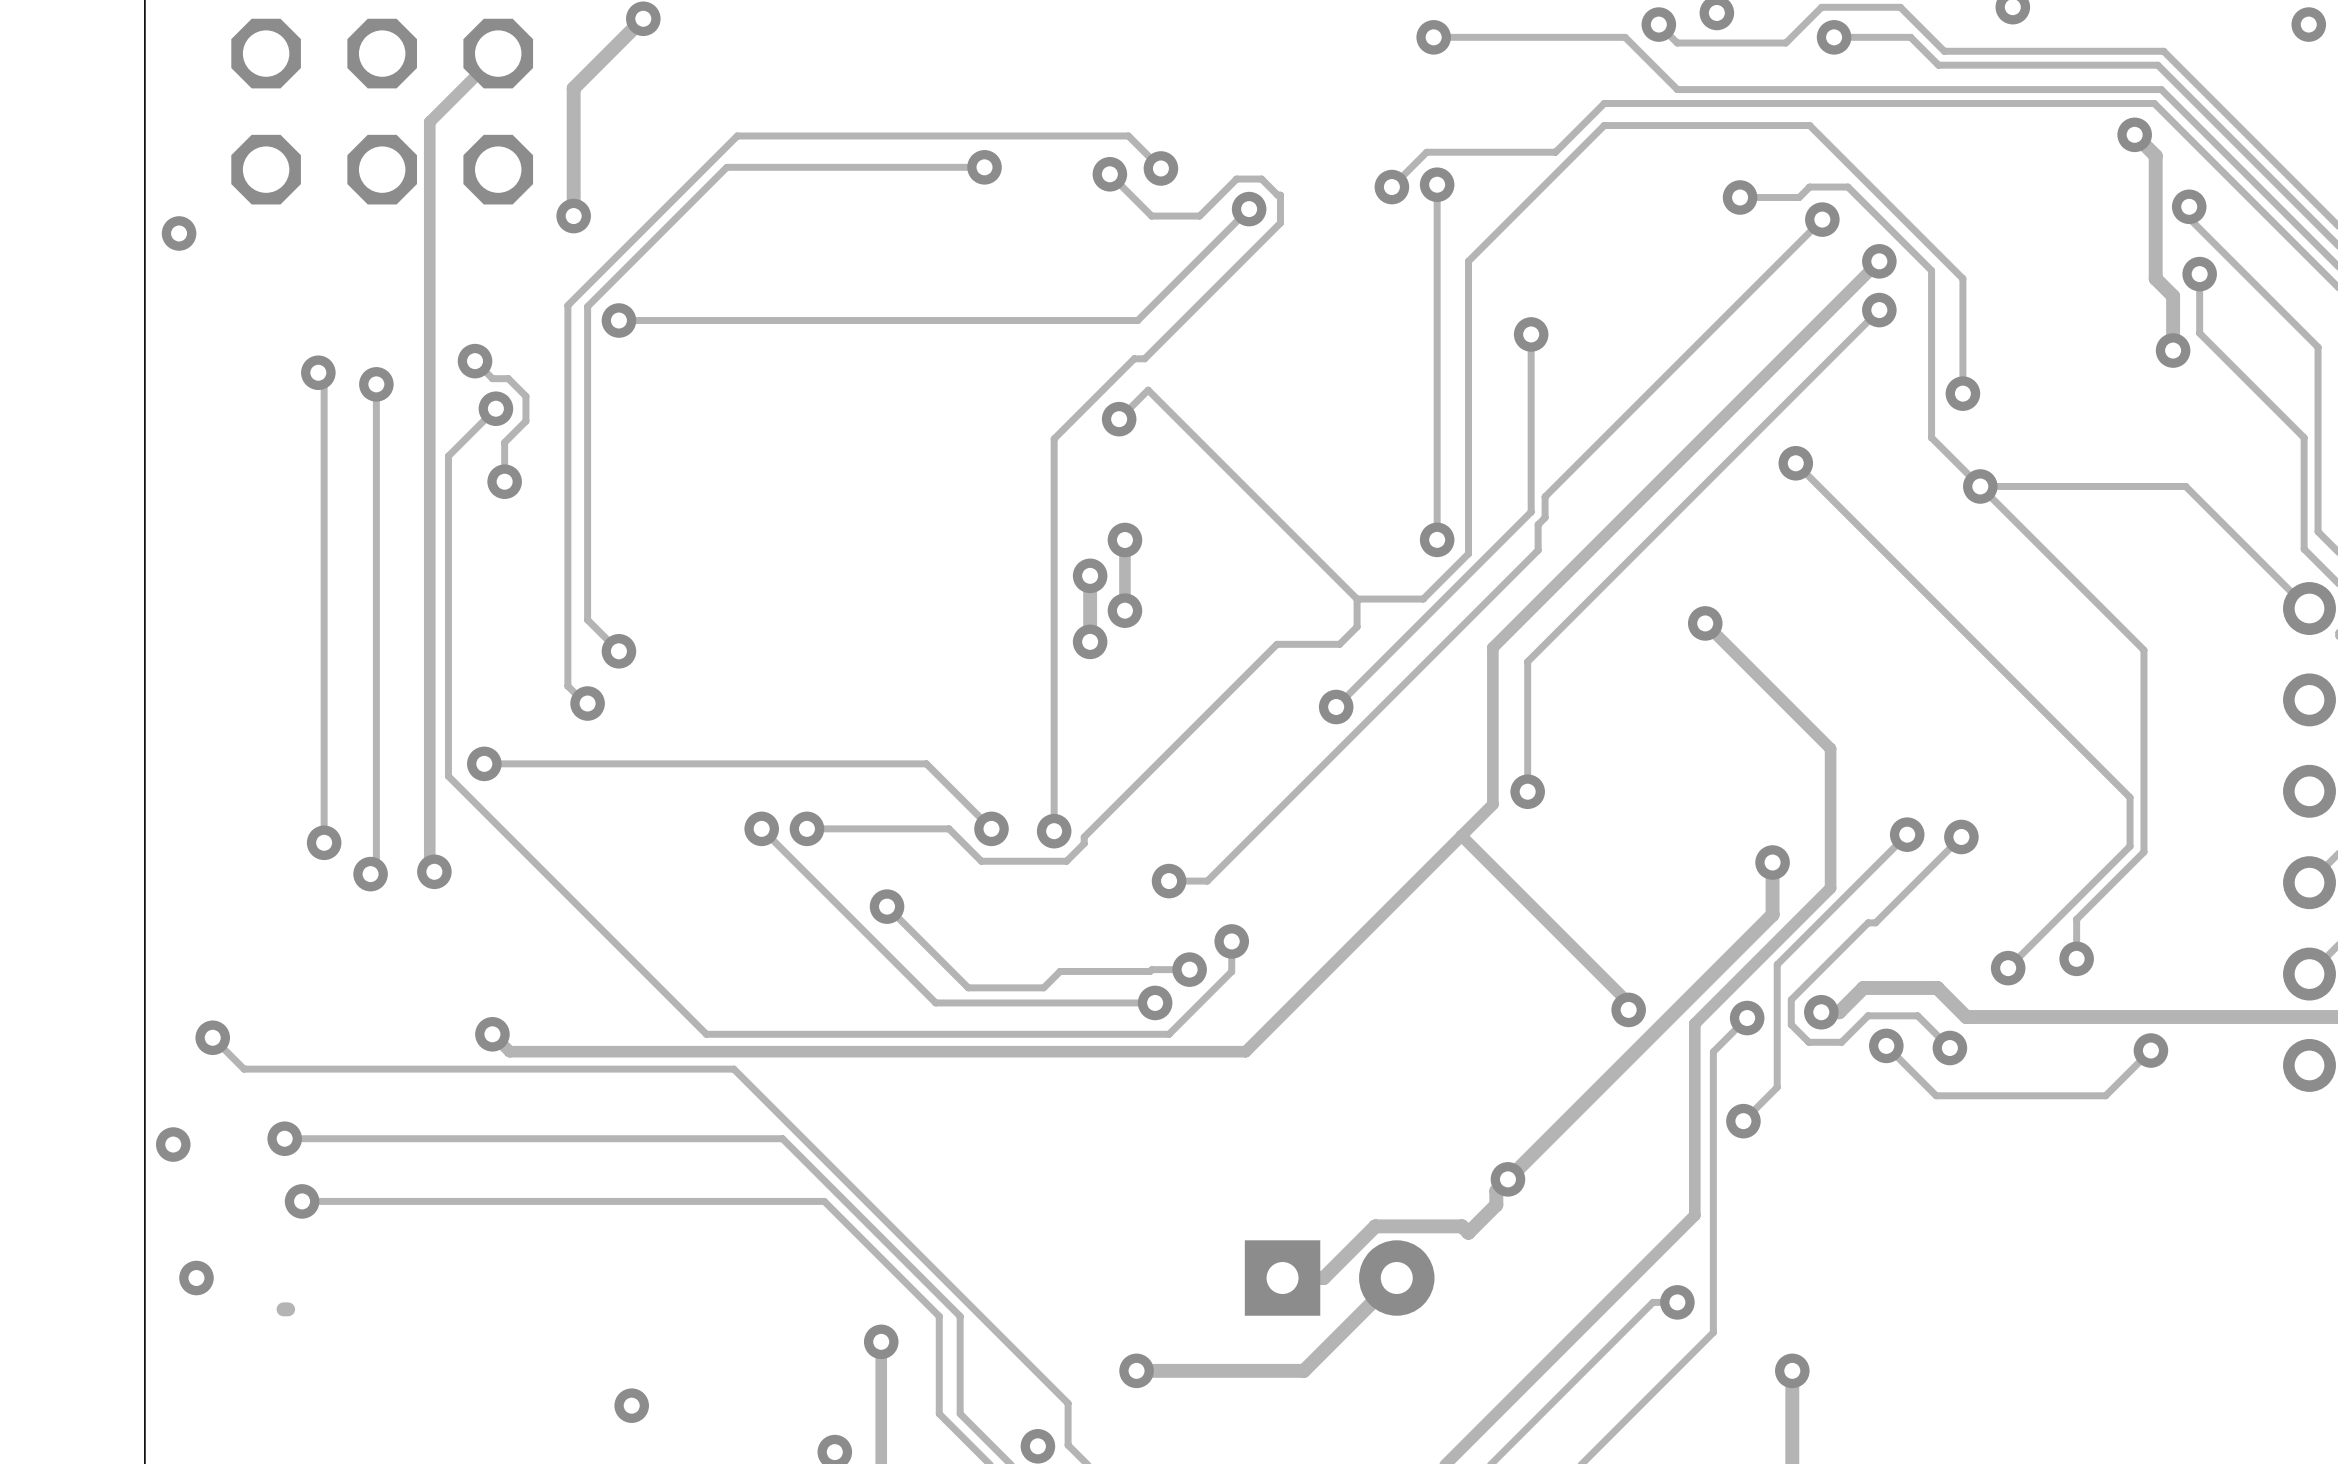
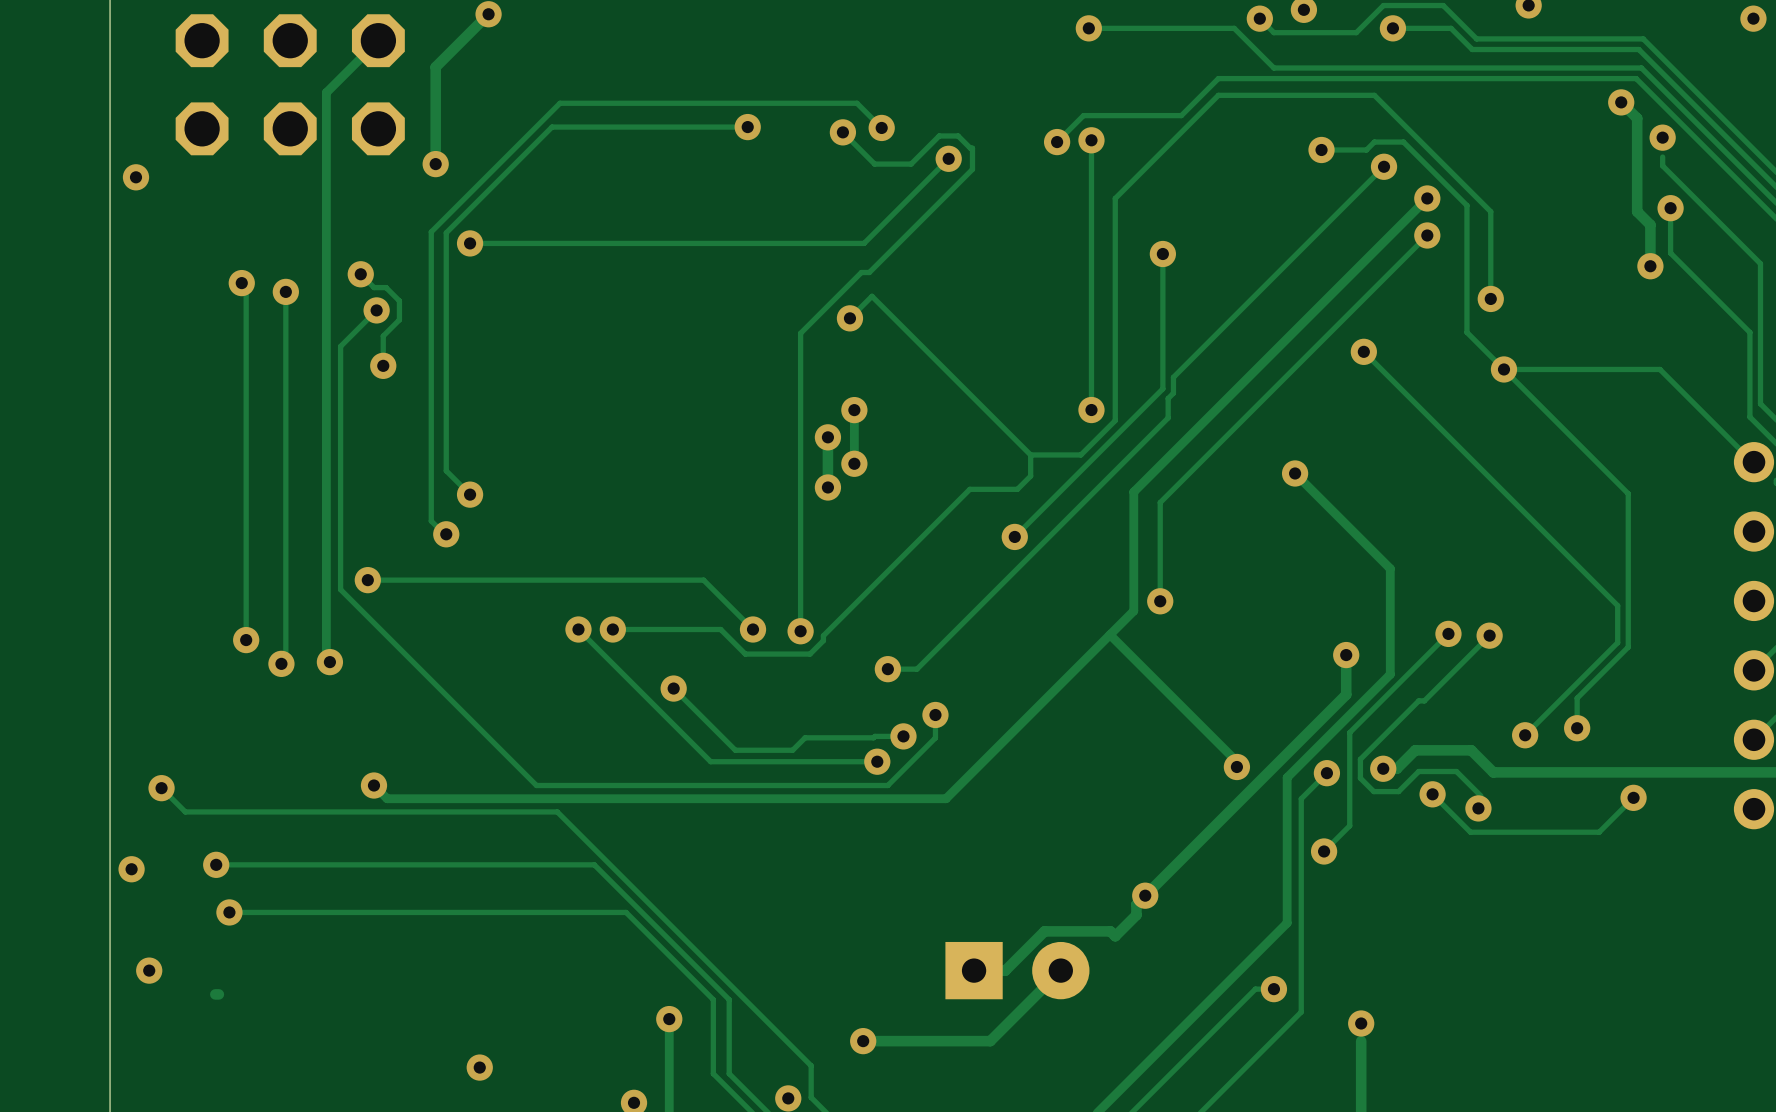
via position: (2189, 206) -> (1662, 137)
via position: (1949, 1048) -> (1478, 808)
via position: (1792, 1370) -> (1361, 1023)

